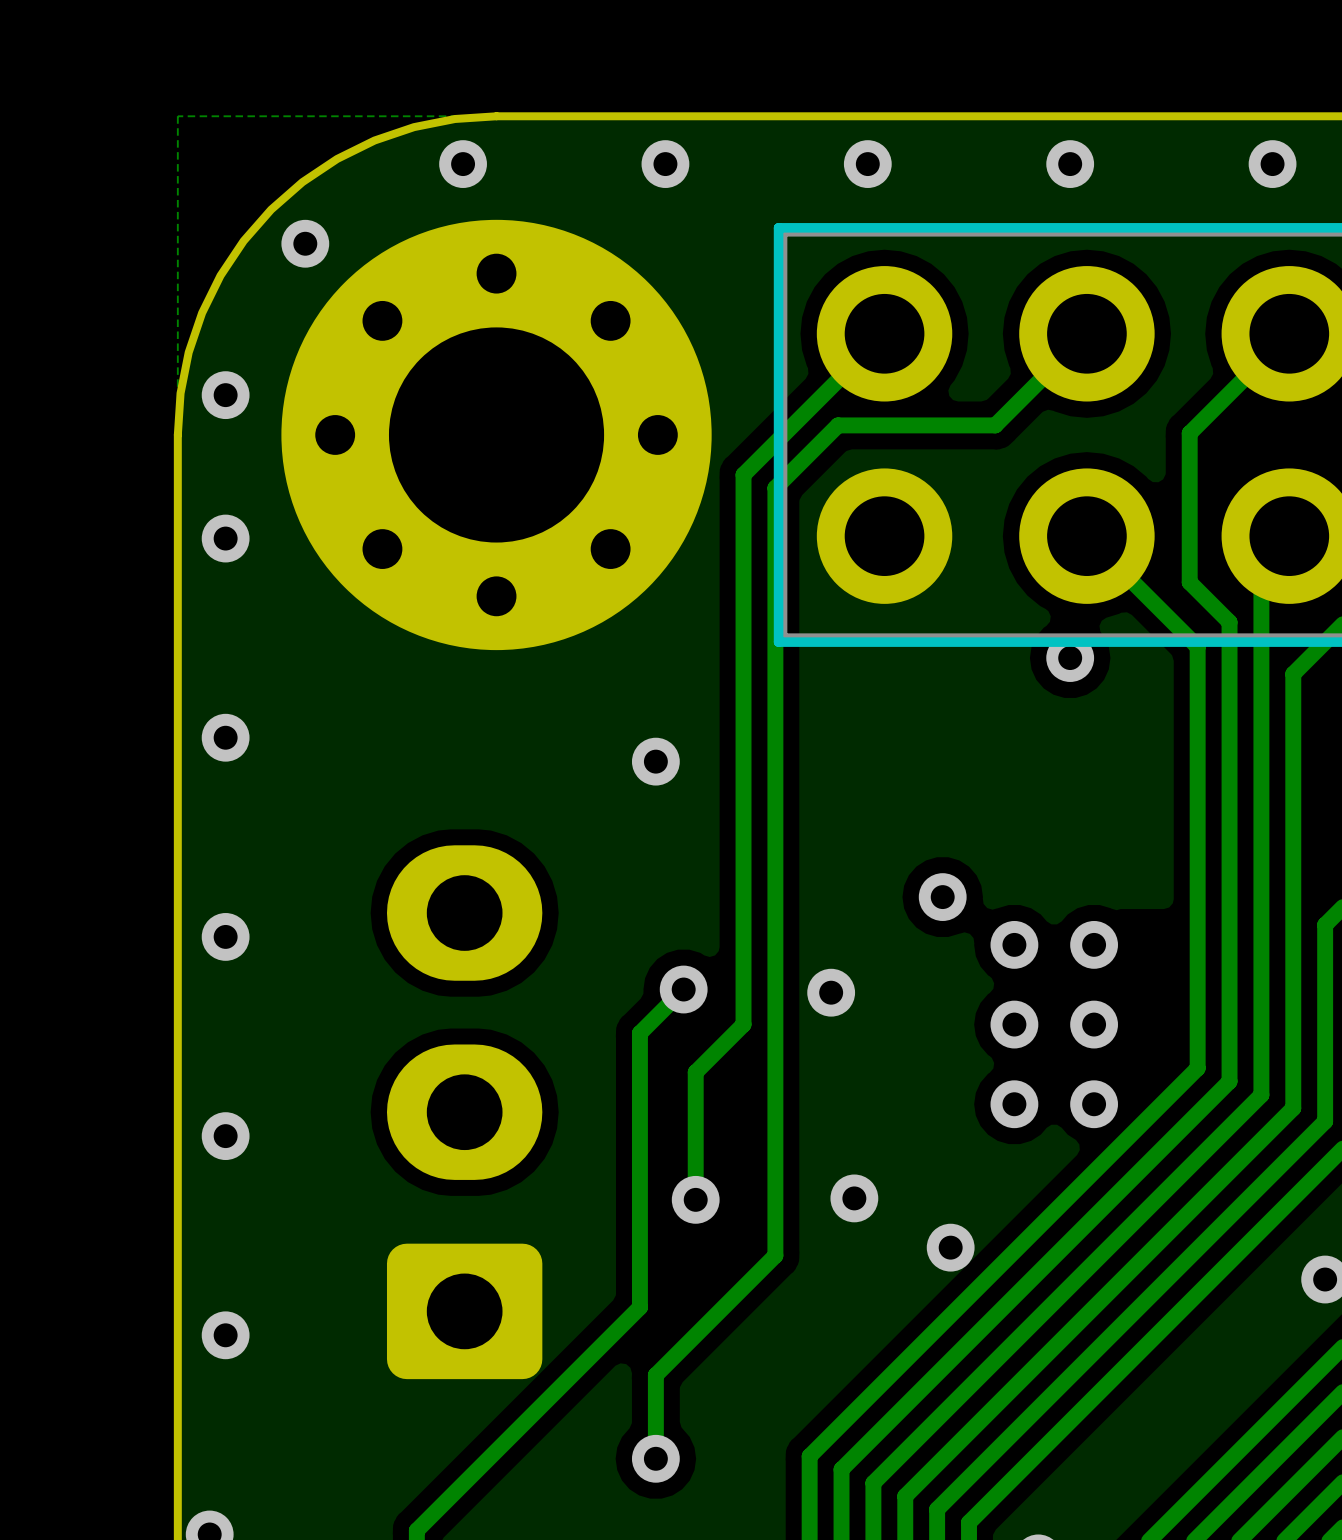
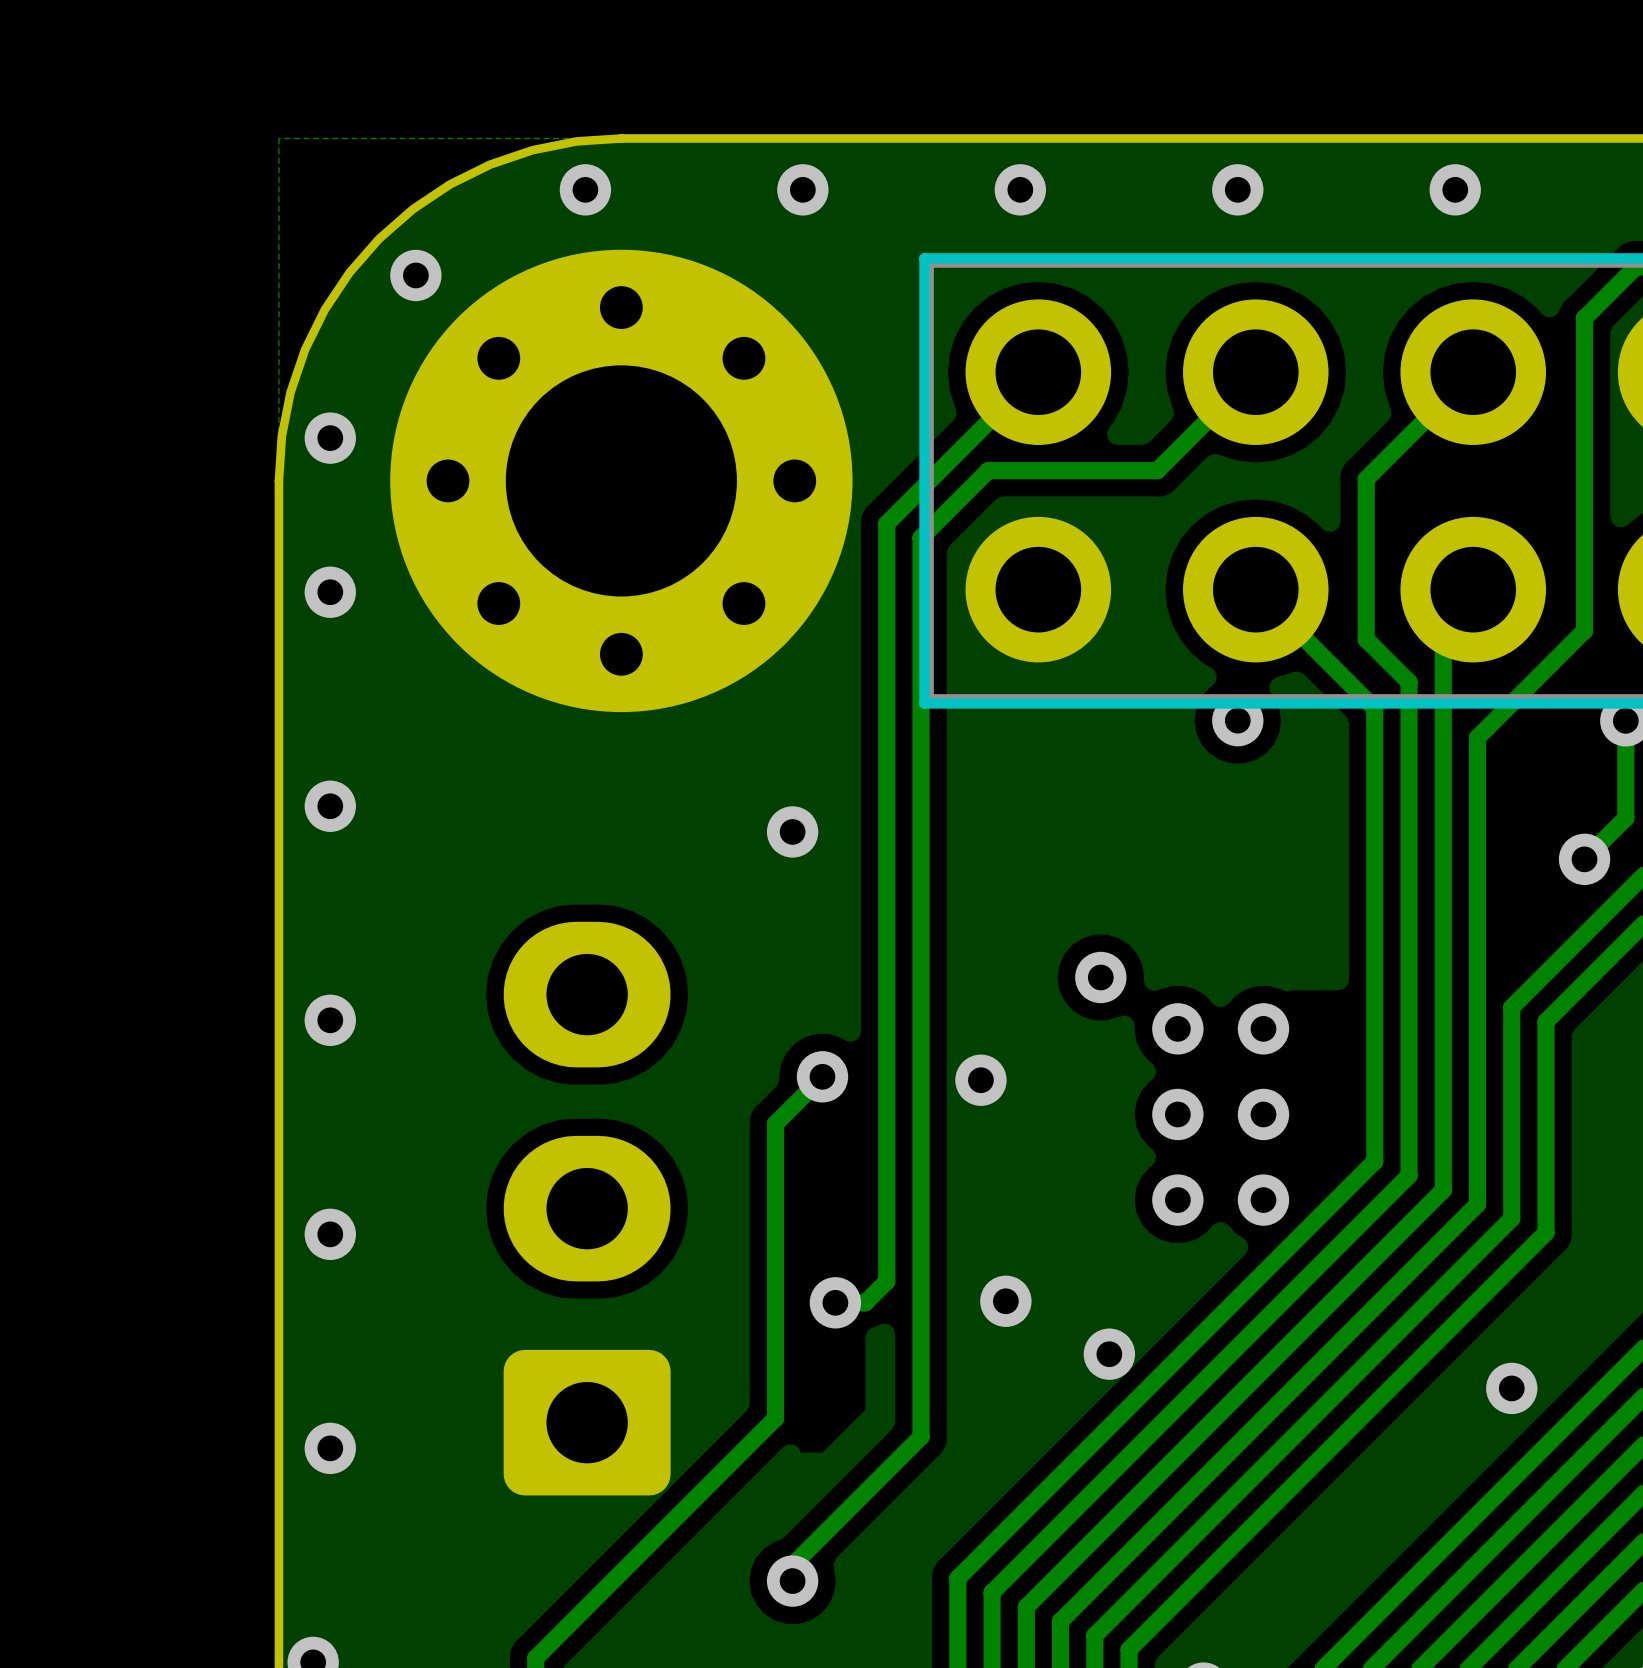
track: (743, 1024) (695, 1072) (695, 1199) -> (886, 1114) (886, 1281) (865, 1302) (835, 1302)
track: (775, 1255) (655, 1375) (655, 1444) -> (921, 1362) (921, 1436) (792, 1565)

